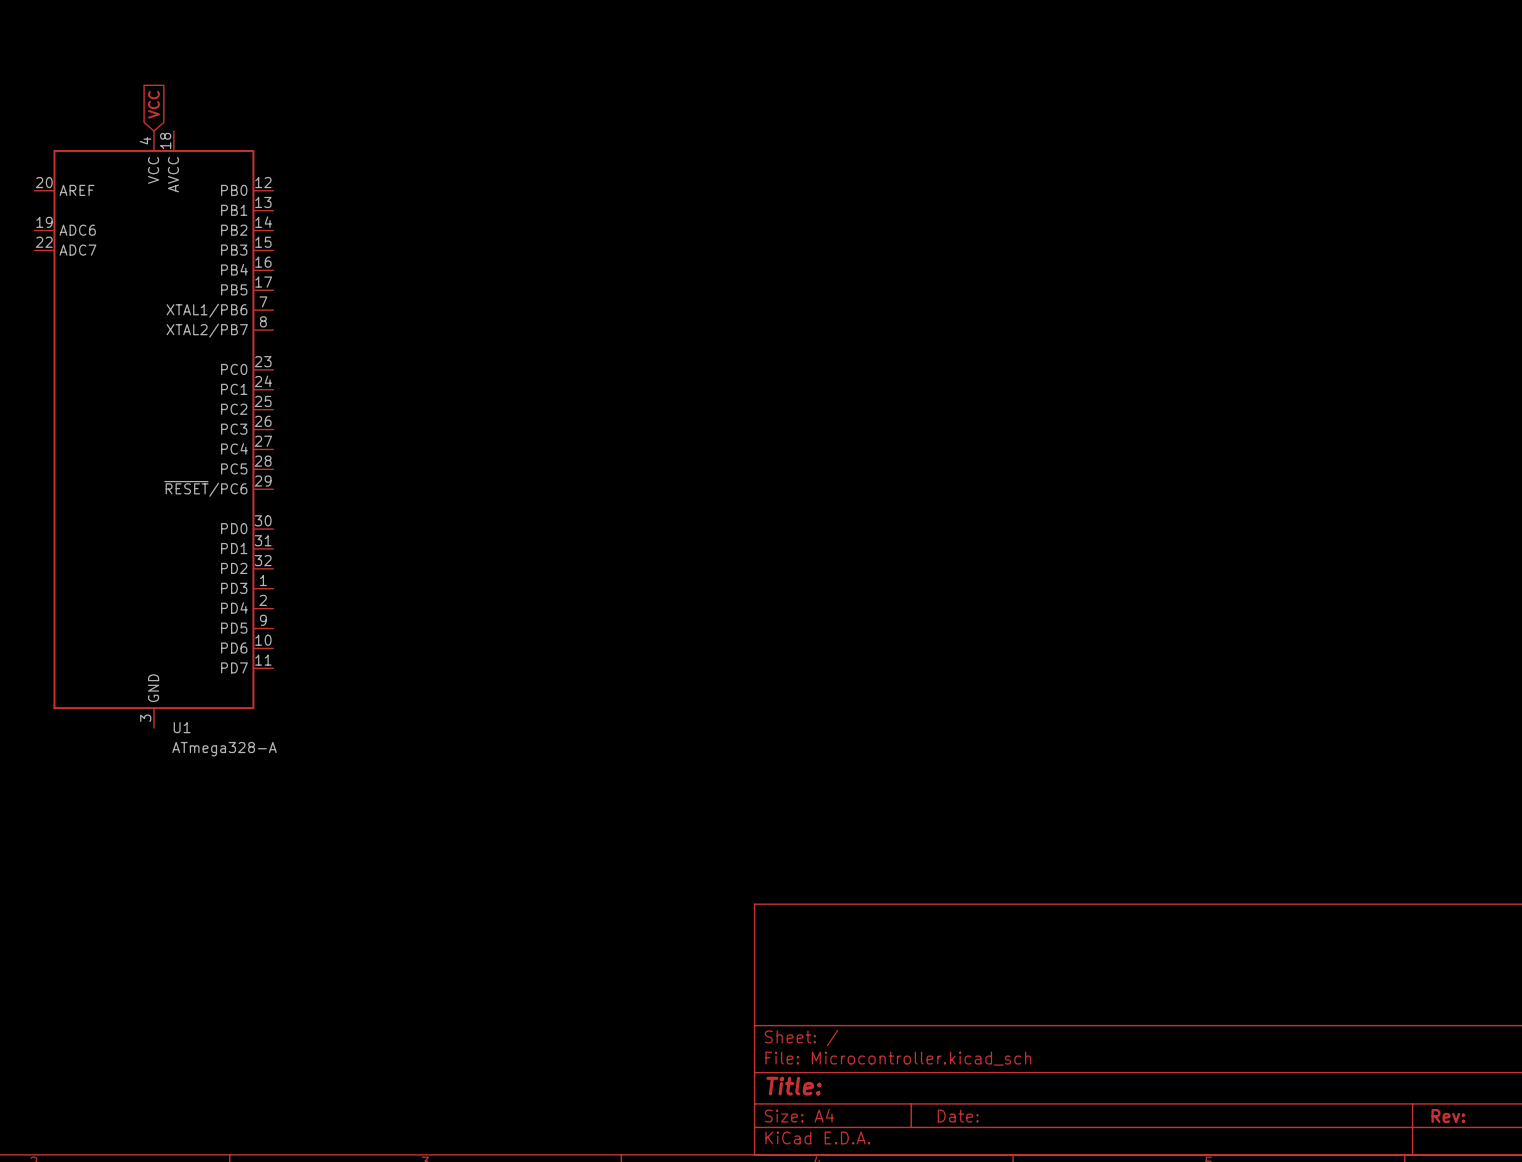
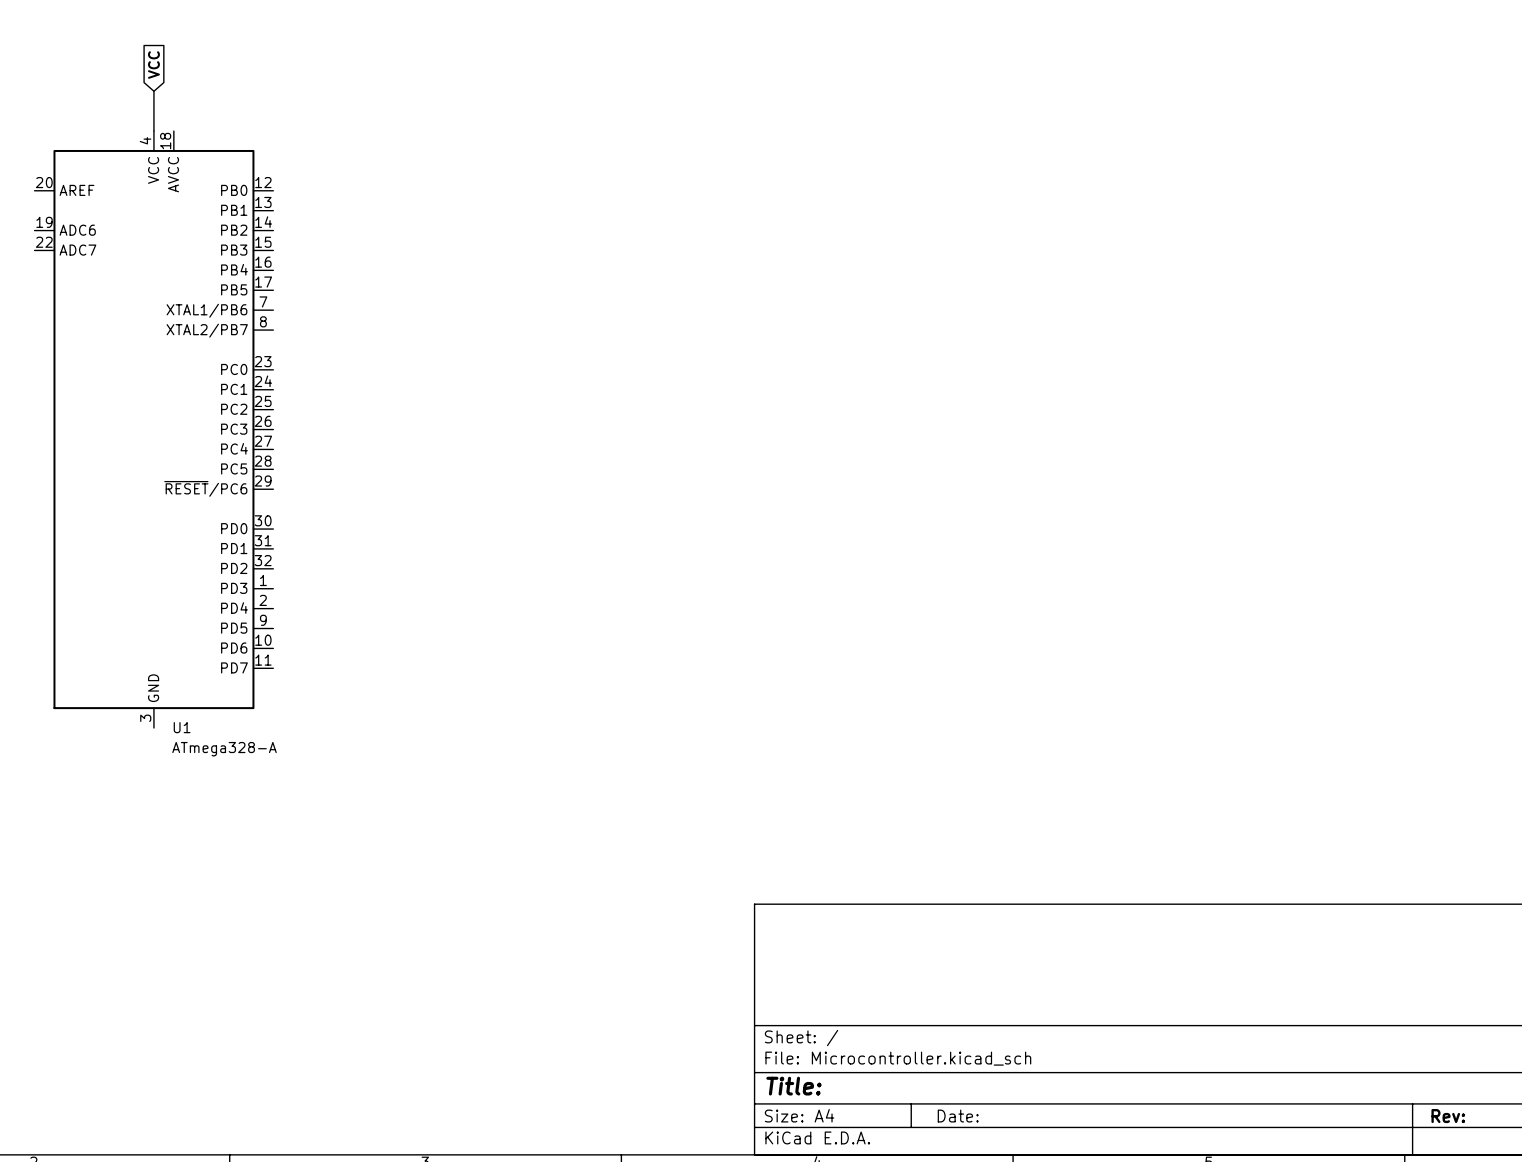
wire: none -> (153, 91) (153, 131)
global label position: VCC (153, 104) -> VCC (153, 65)

